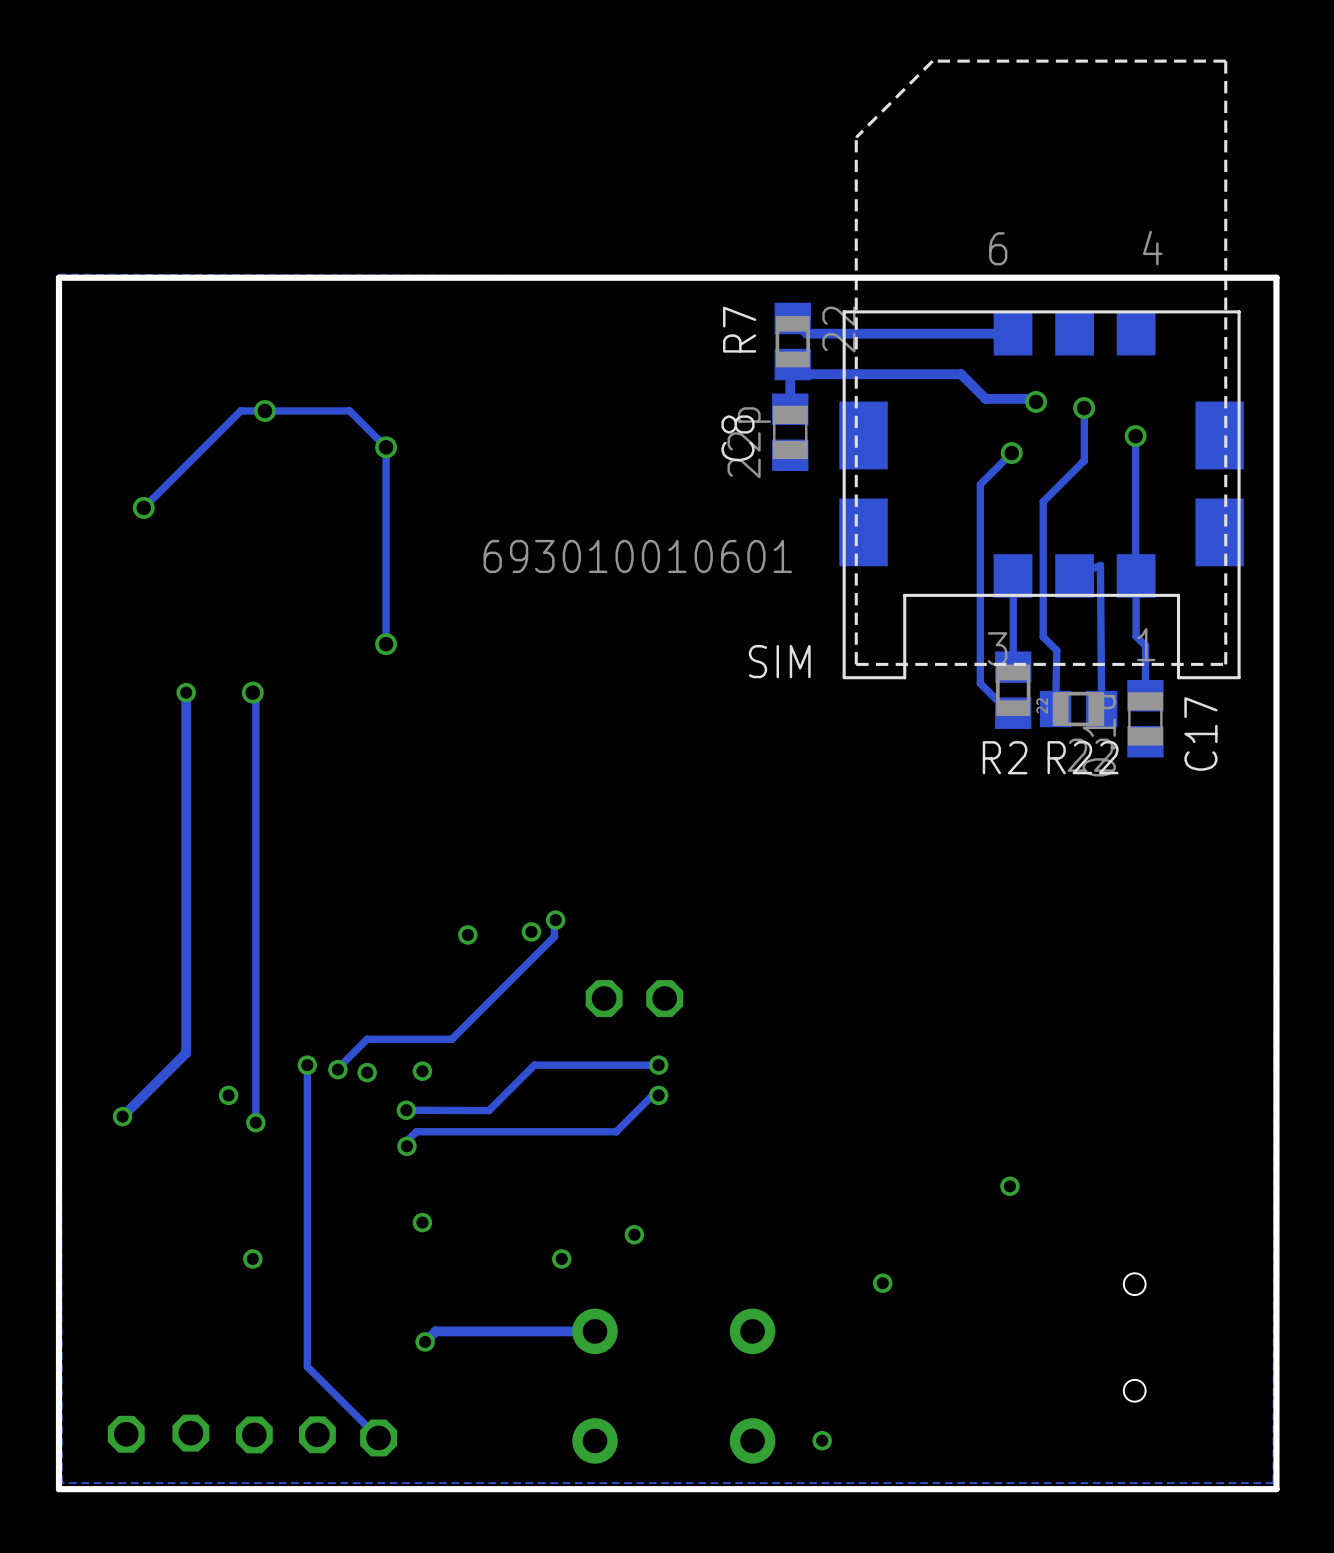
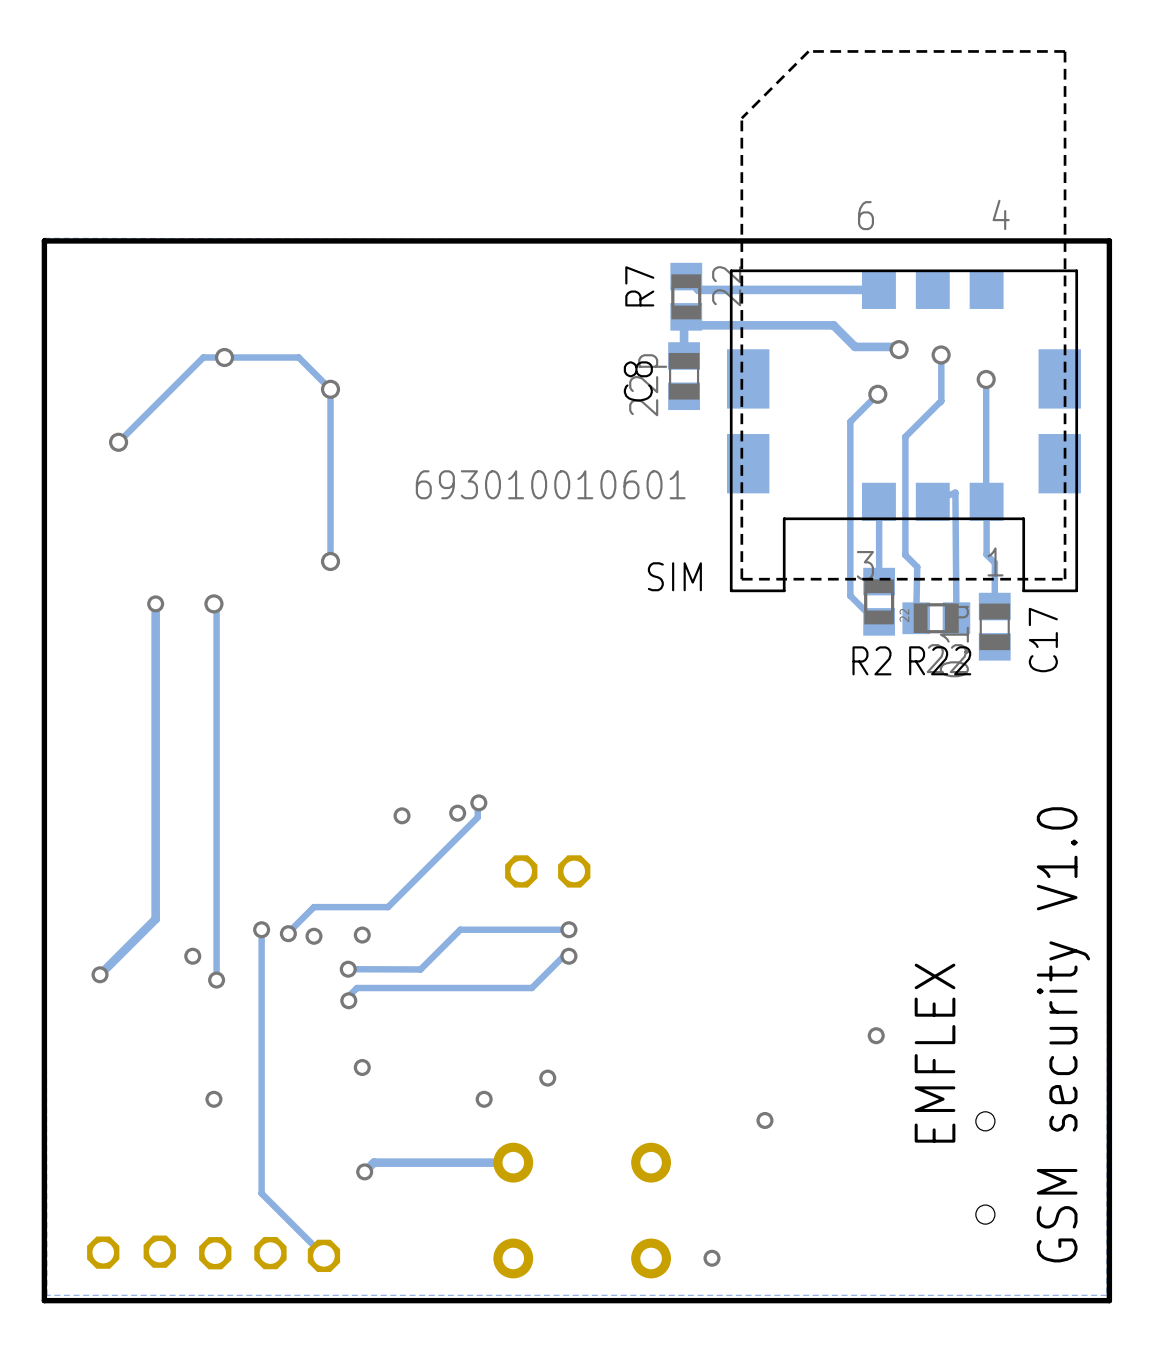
text: none -> GSM security V1.0 (1063, 1034)
text: none -> EMFLEX (935, 1053)

